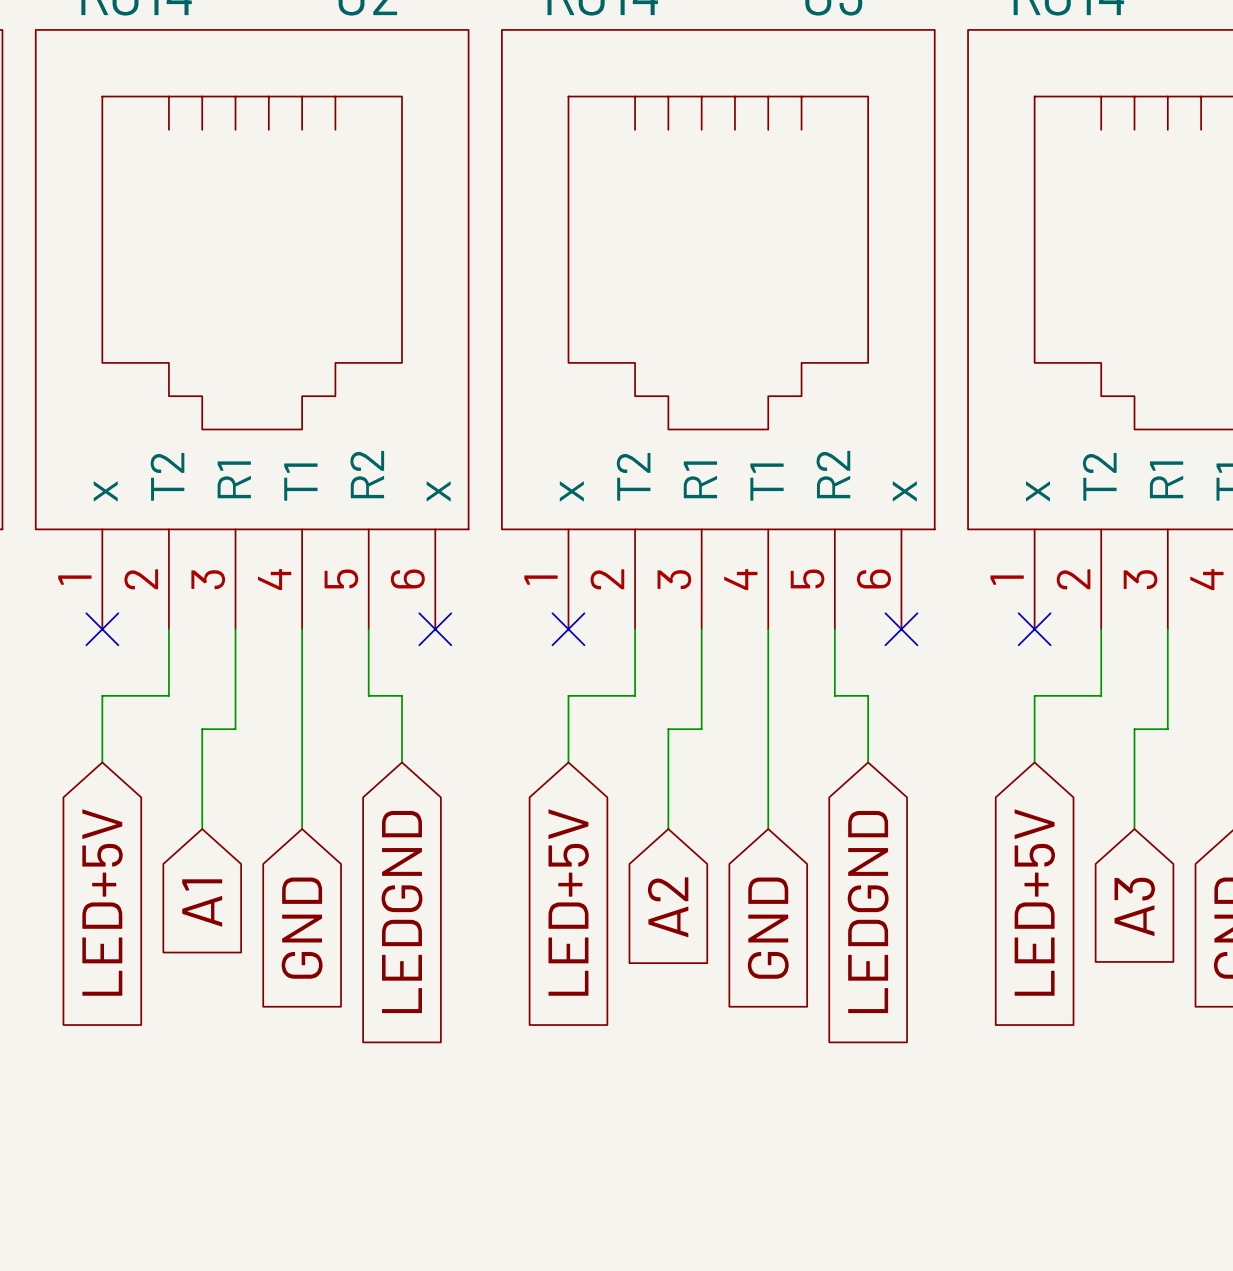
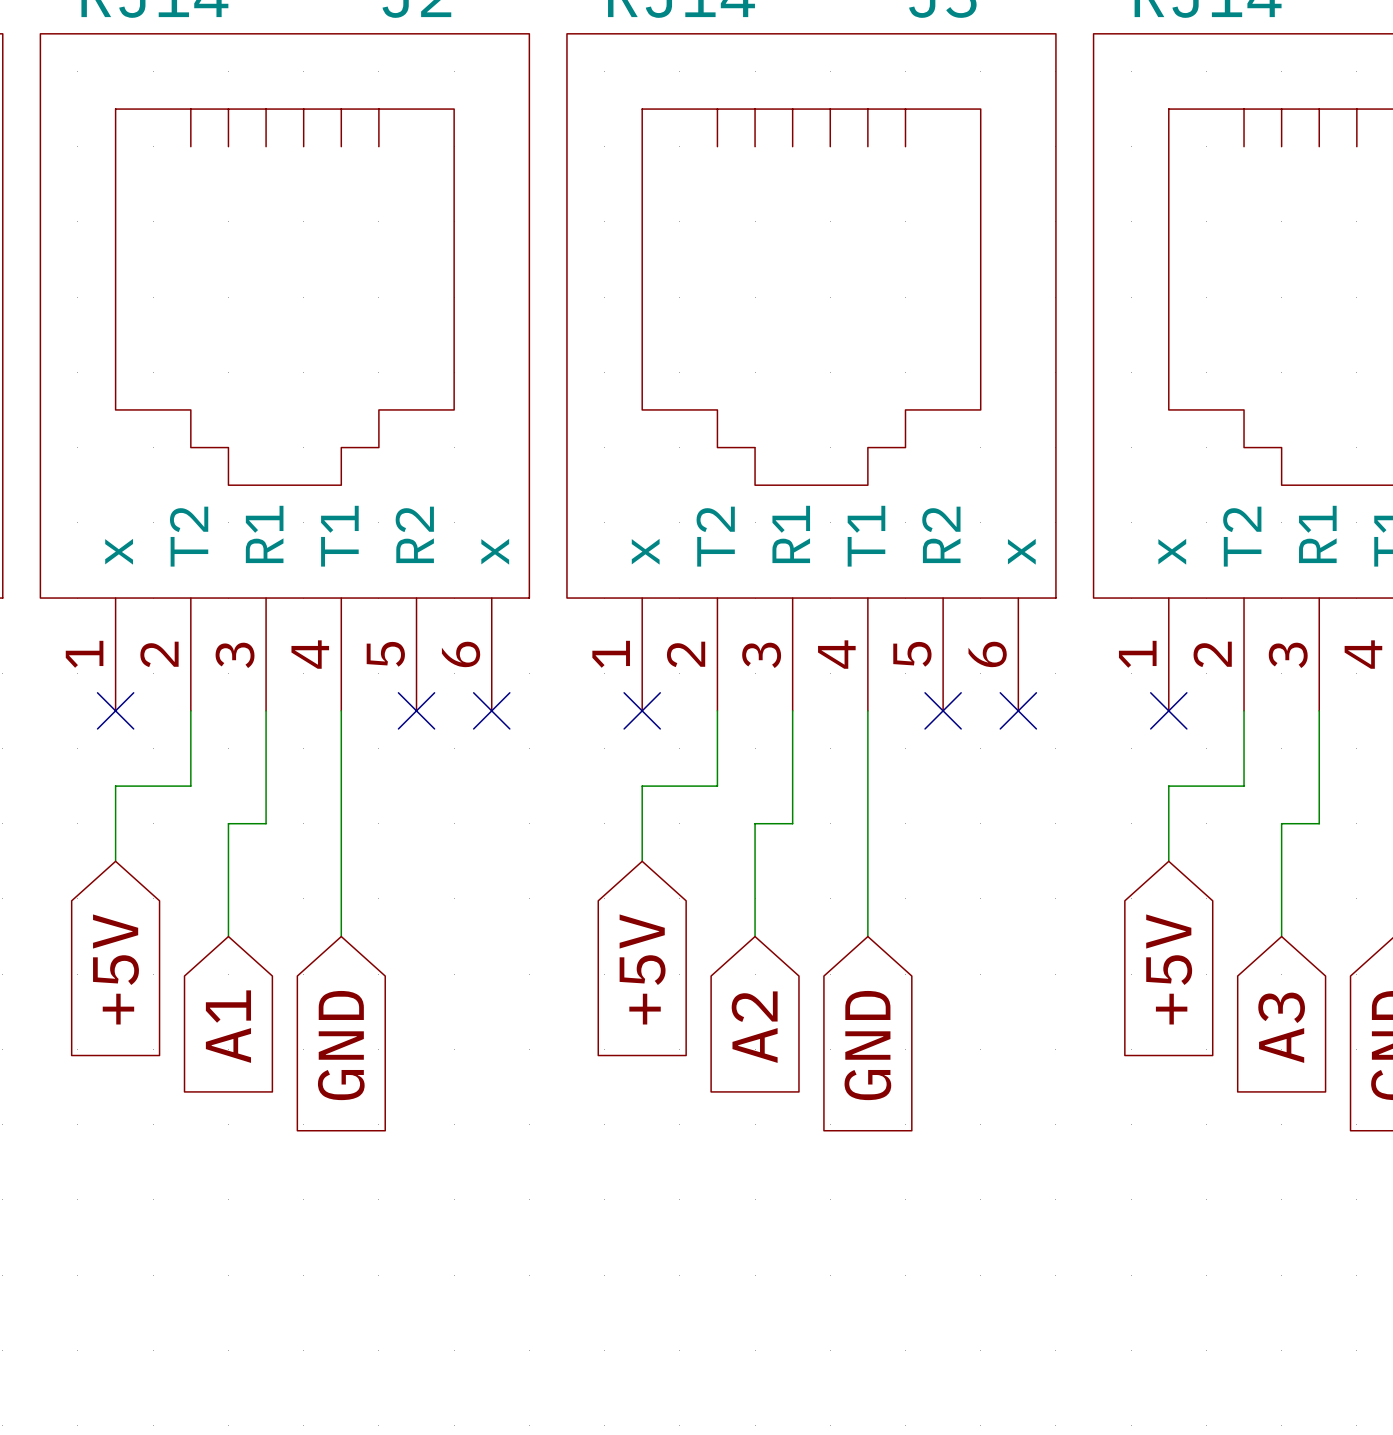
wire: (368, 629) (368, 695) (402, 695) (402, 762) -> none
no-connect mark: none -> (416, 710)
wire: (834, 629) (834, 695) (868, 695) (868, 762) -> none
no-connect mark: none -> (943, 710)
global label: LED+5V (102, 902) -> +5V (116, 969)
global label: LED+5V (568, 902) -> +5V (642, 969)
global label: LED+5V (1034, 902) -> +5V (1169, 969)
global label: LEDGND (402, 912) -> none
global label: LEDGND (868, 912) -> none

